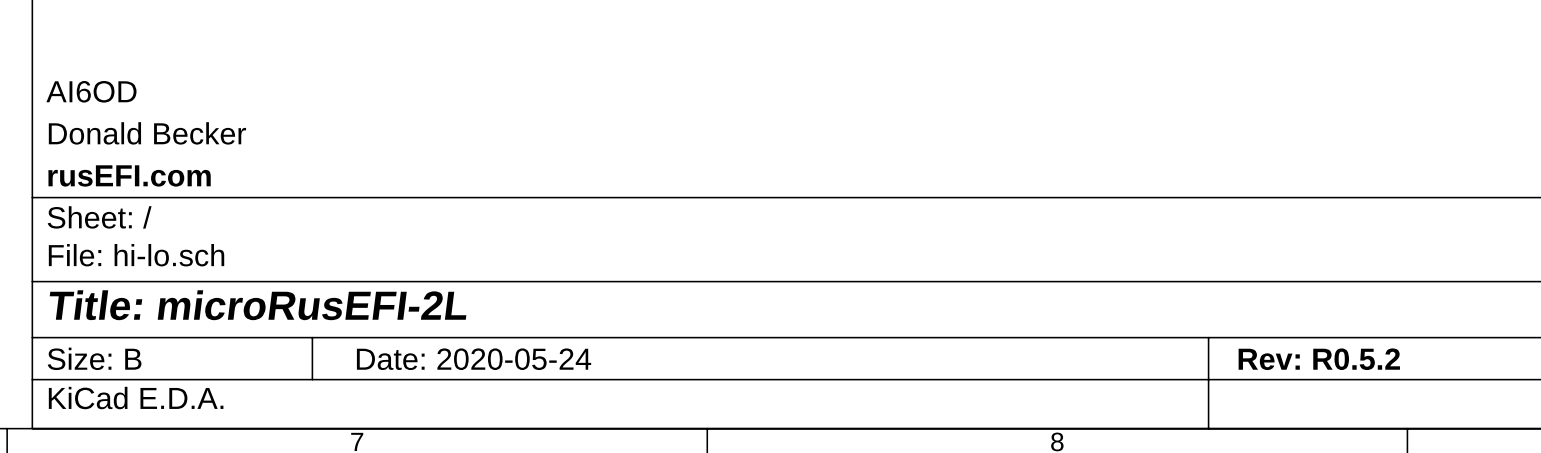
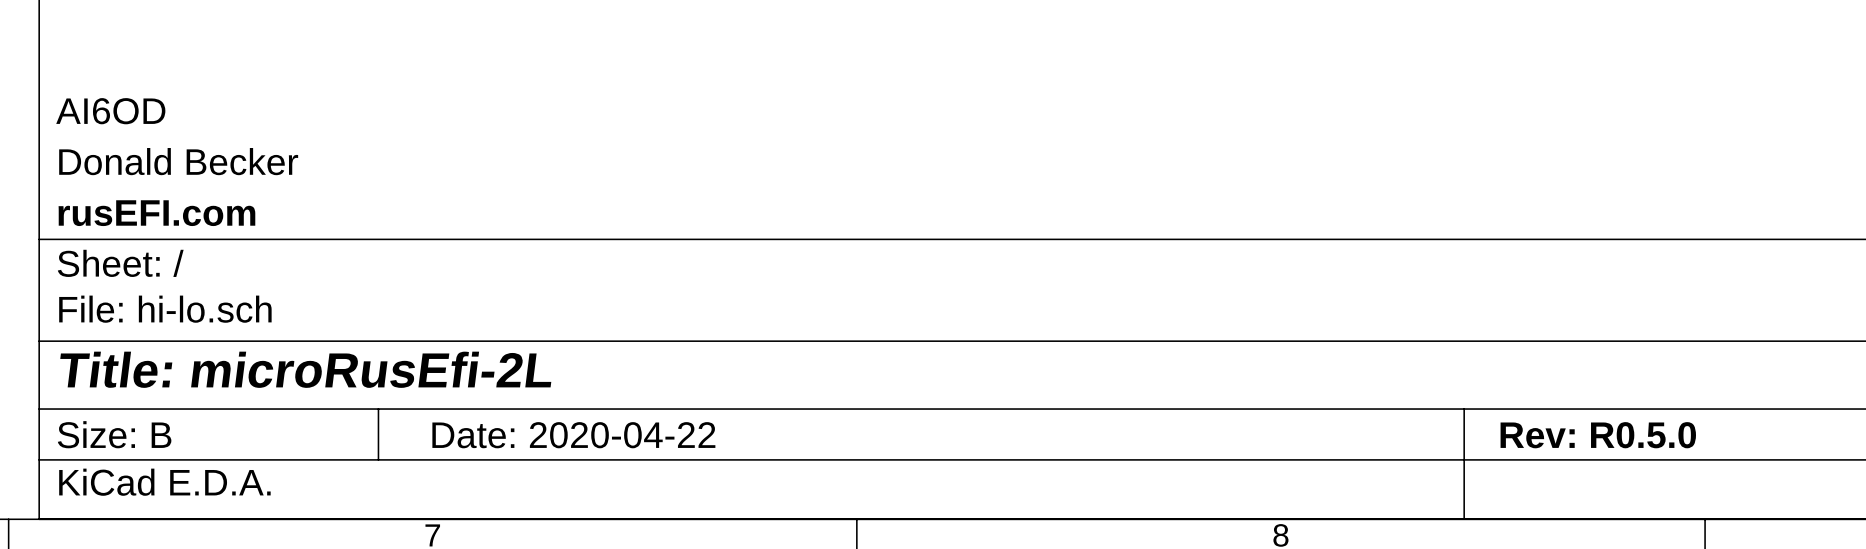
title block: Title: microRusEFI-2L (258, 305) -> Title: microRusEfi-2L (305, 369)
title block: Date: 2020-05-24 (474, 359) -> Date: 2020-04-22 (573, 435)
title block: Rev: R0.5.2 (1319, 359) -> Rev: R0.5.0 (1598, 435)

